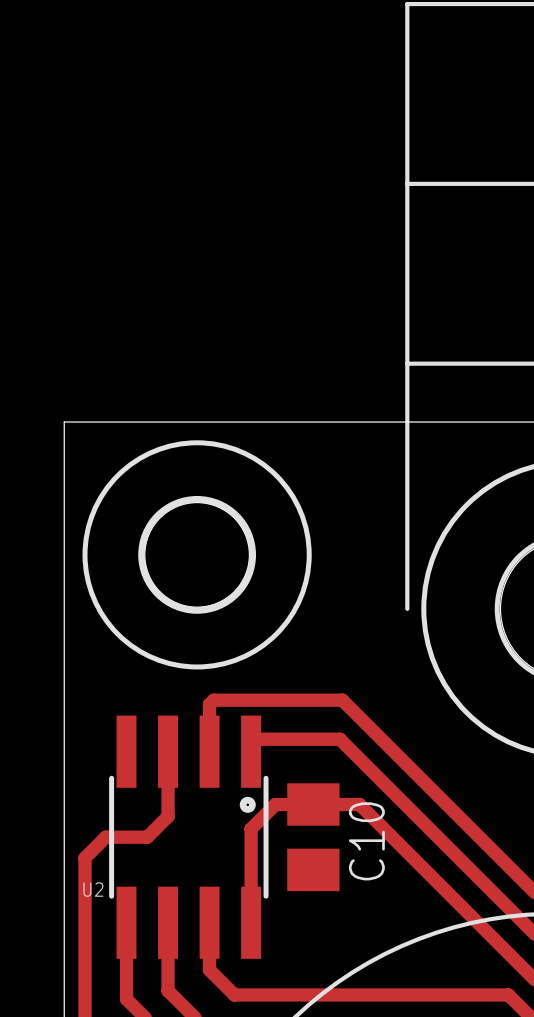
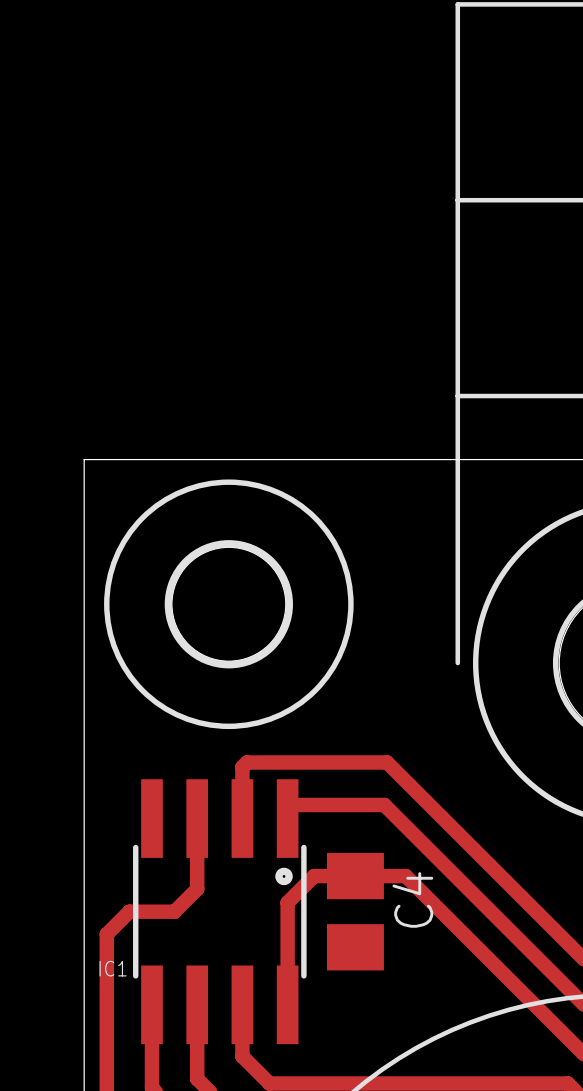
C10 name: C10 (366, 841) -> C4 (412, 899)
U2 name: U2 (93, 889) -> IC1 (113, 968)

